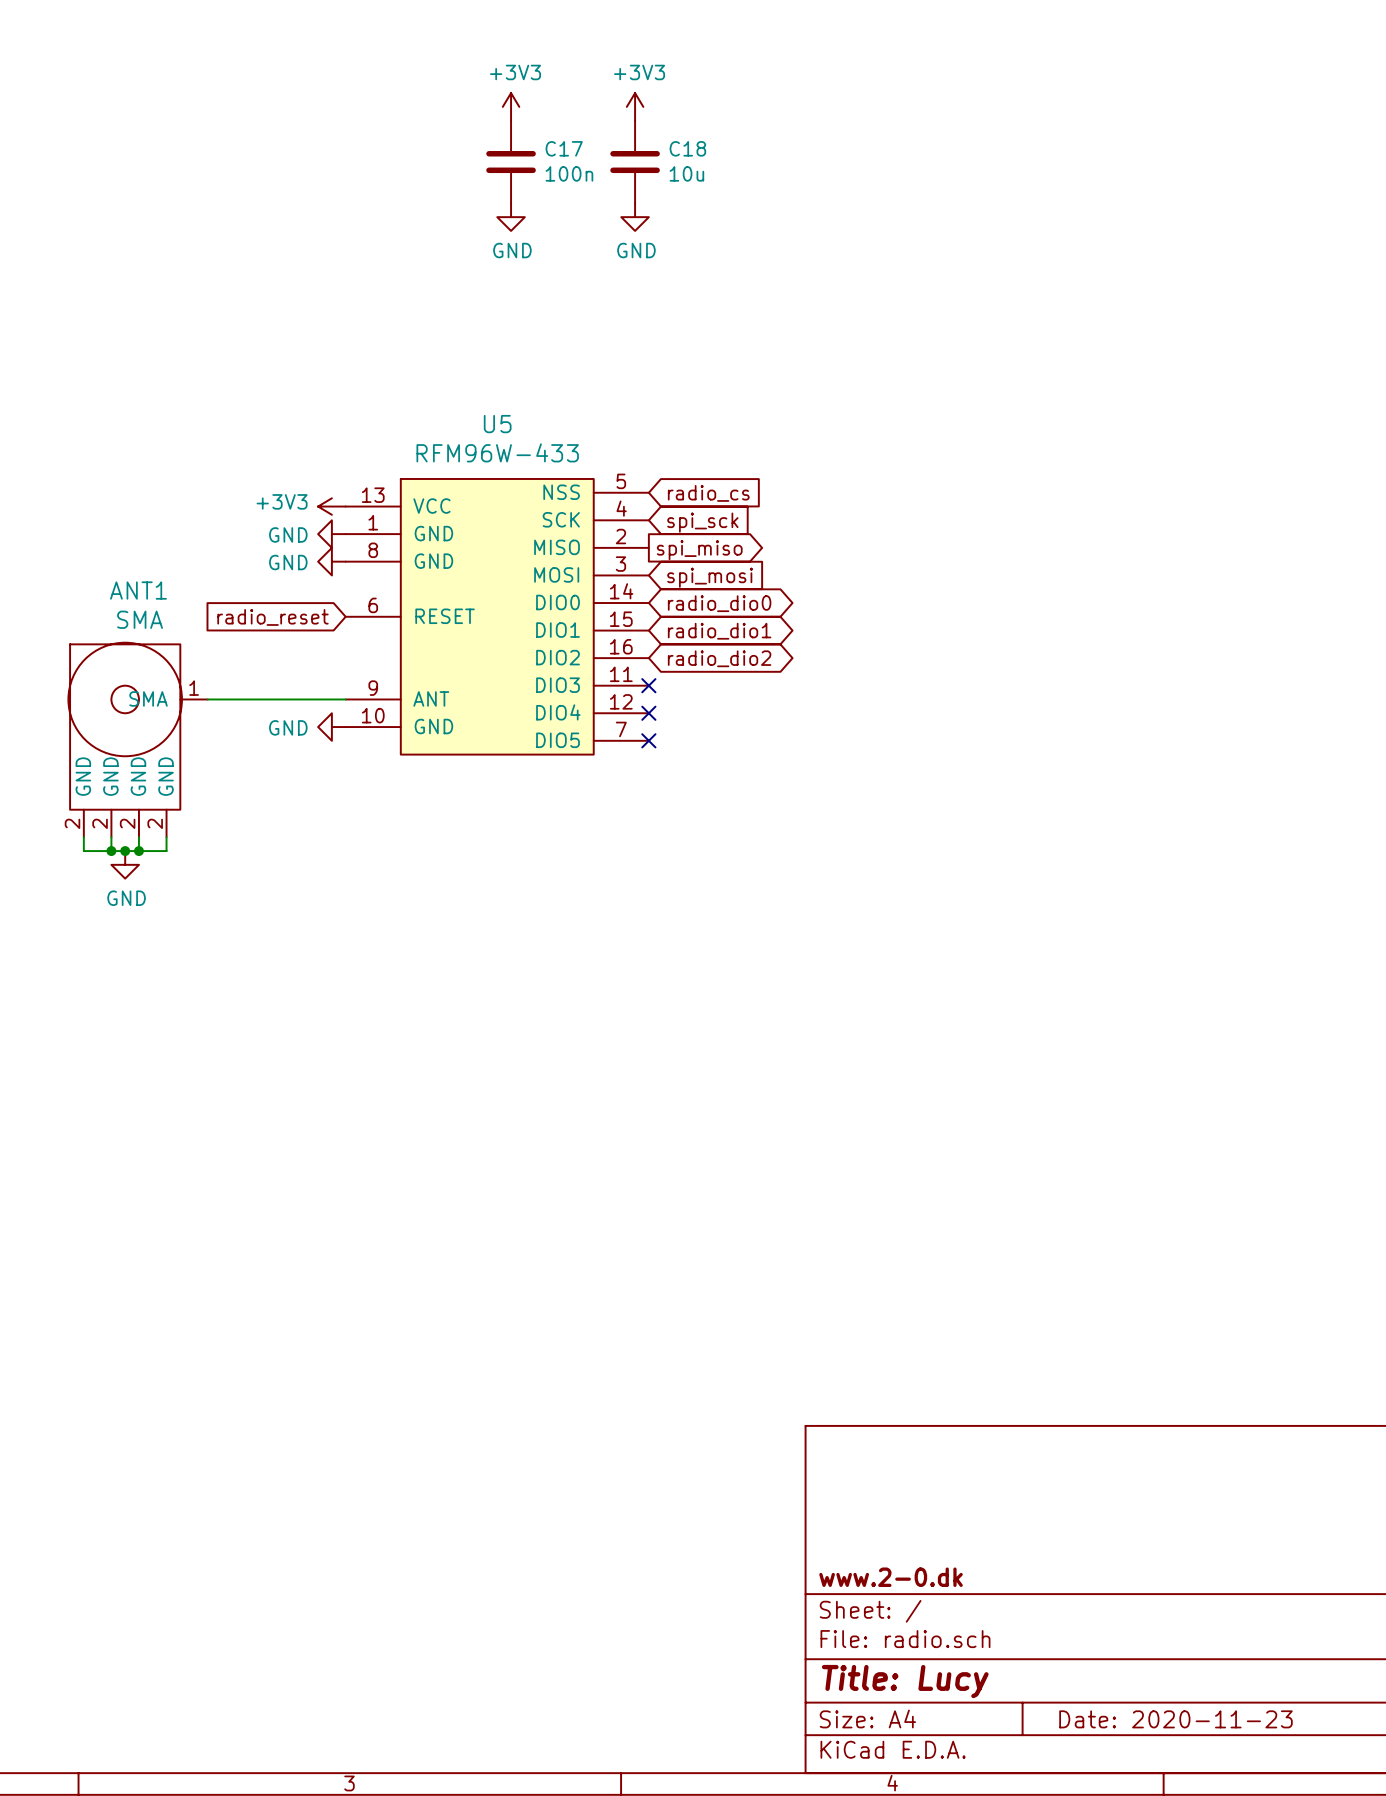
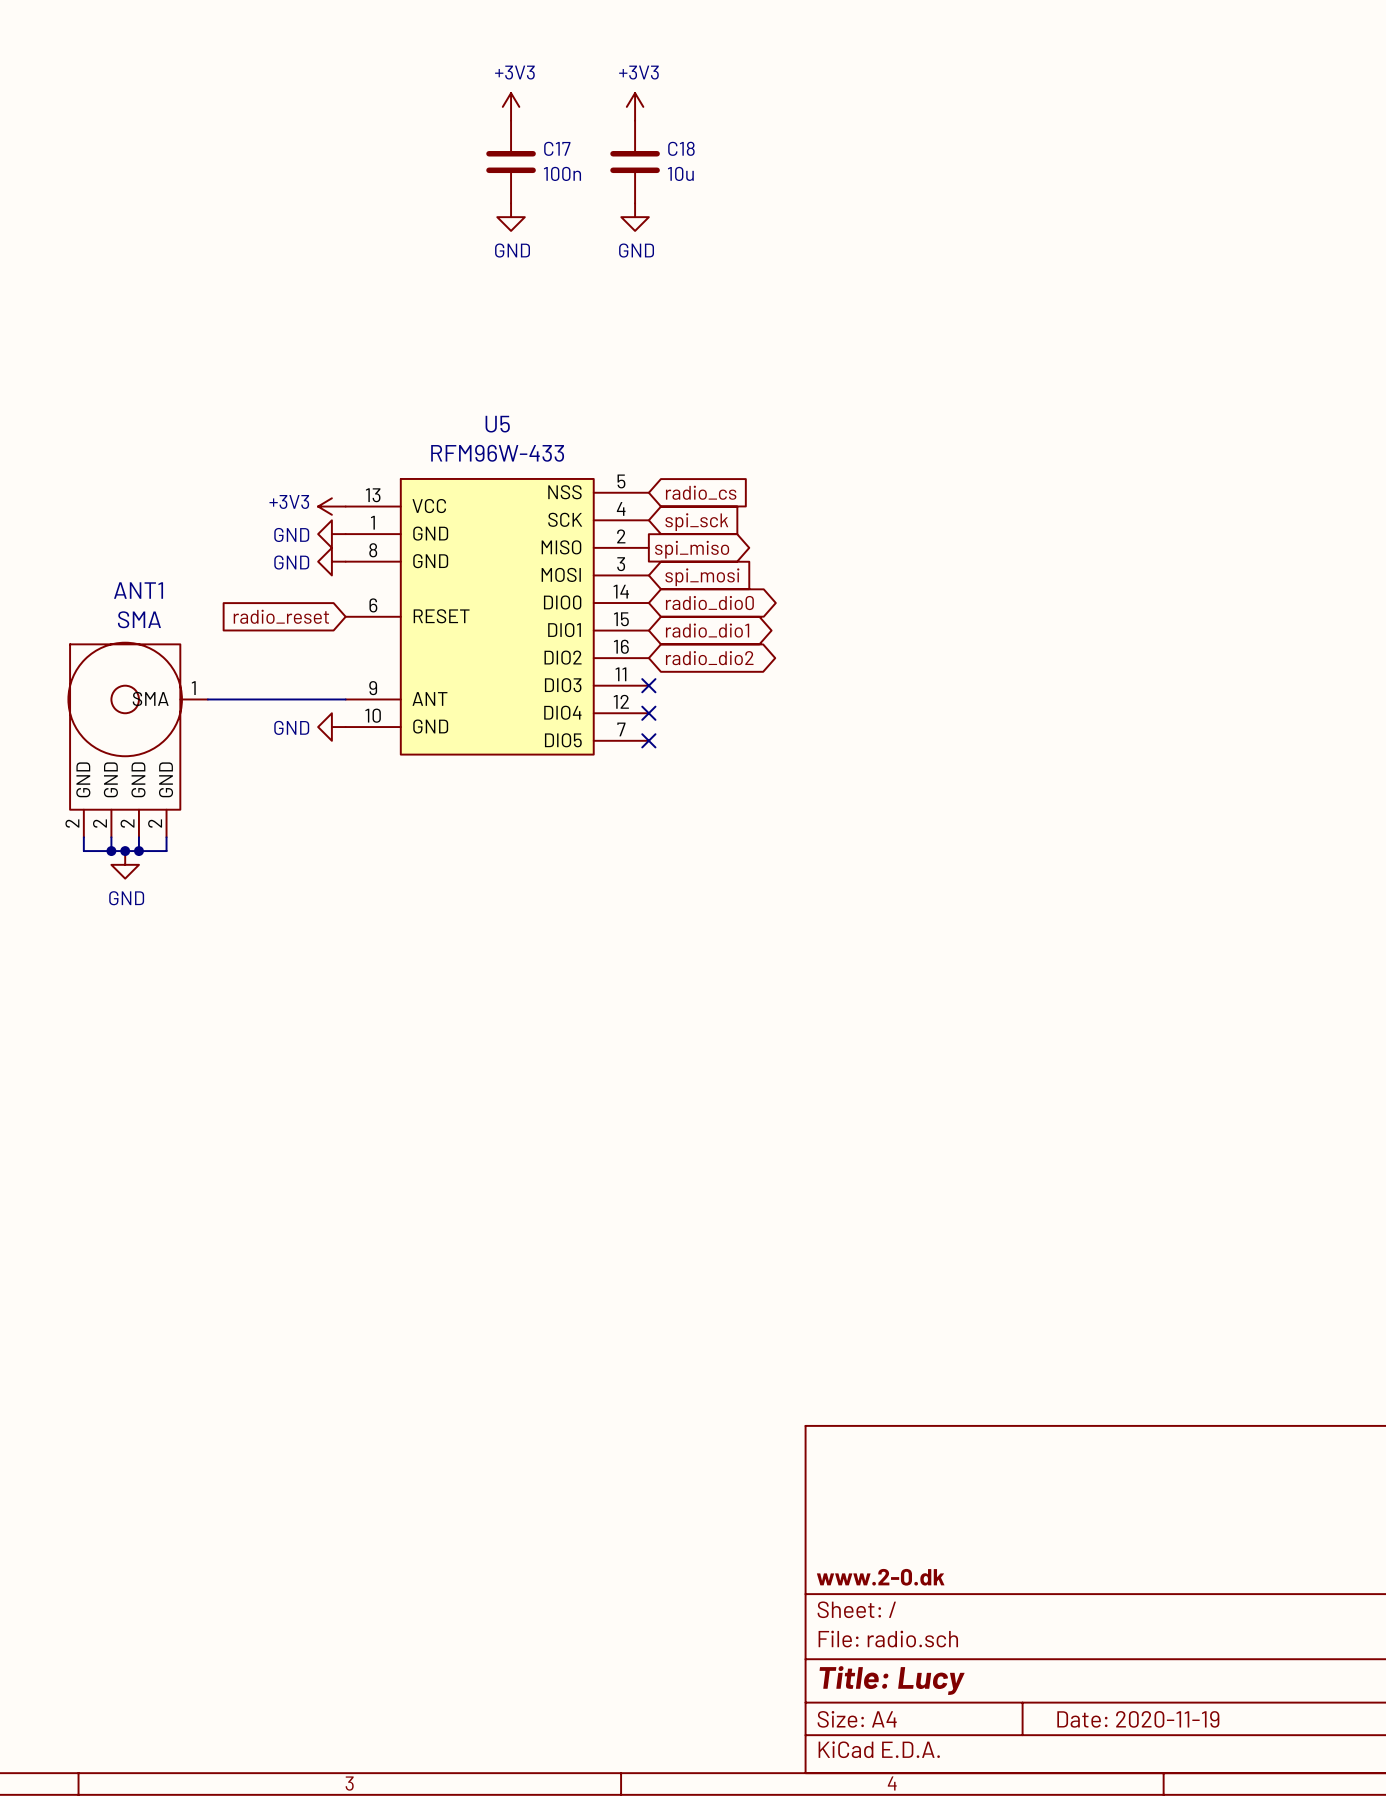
title block: Date: 2020-11-23 (1175, 1719) -> Date: 2020-11-19 (1138, 1719)

